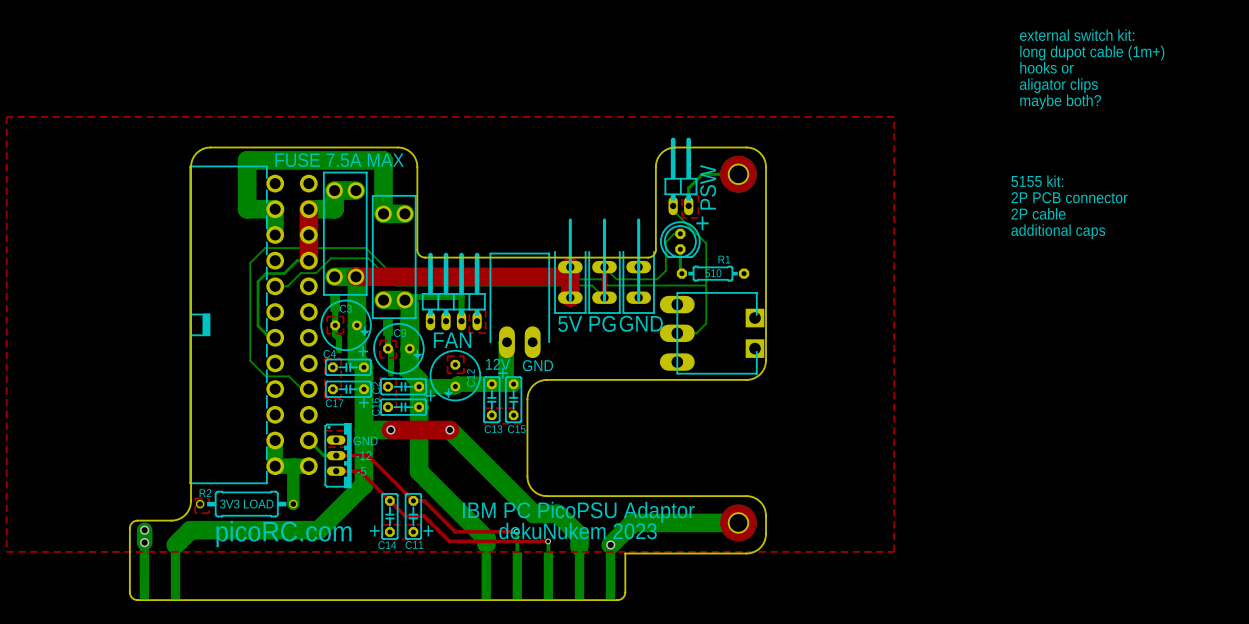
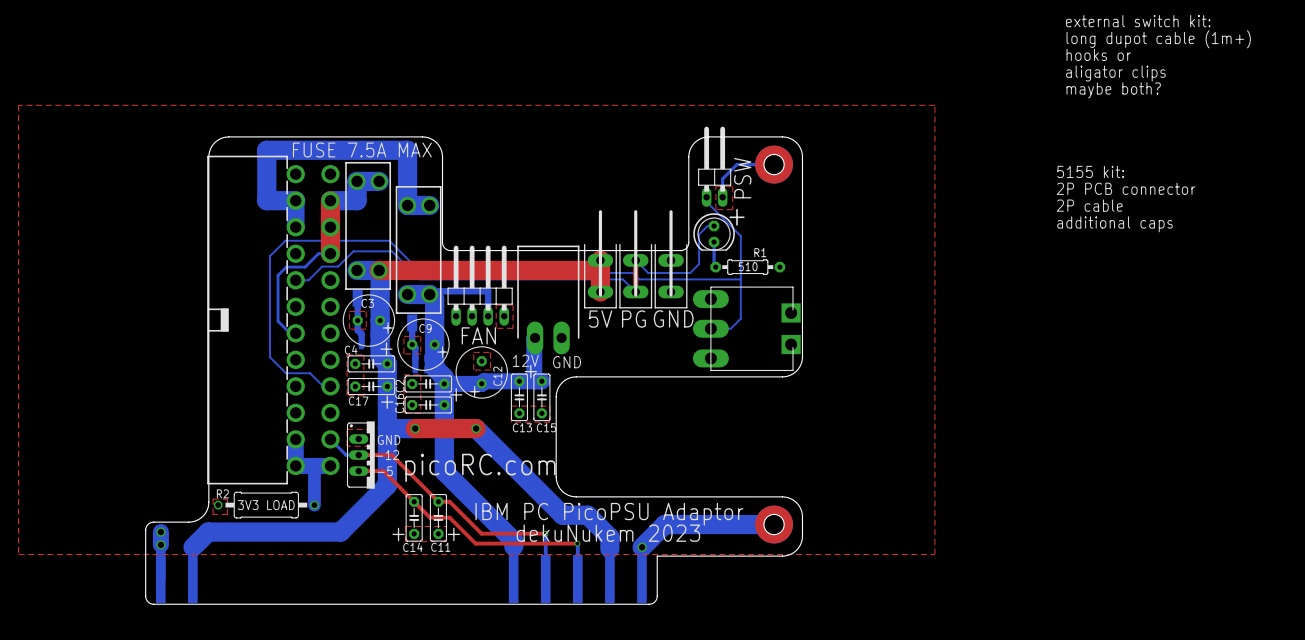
text: none -> picoRC.com (480, 467)
text: picoRC.com (283, 534) -> none

